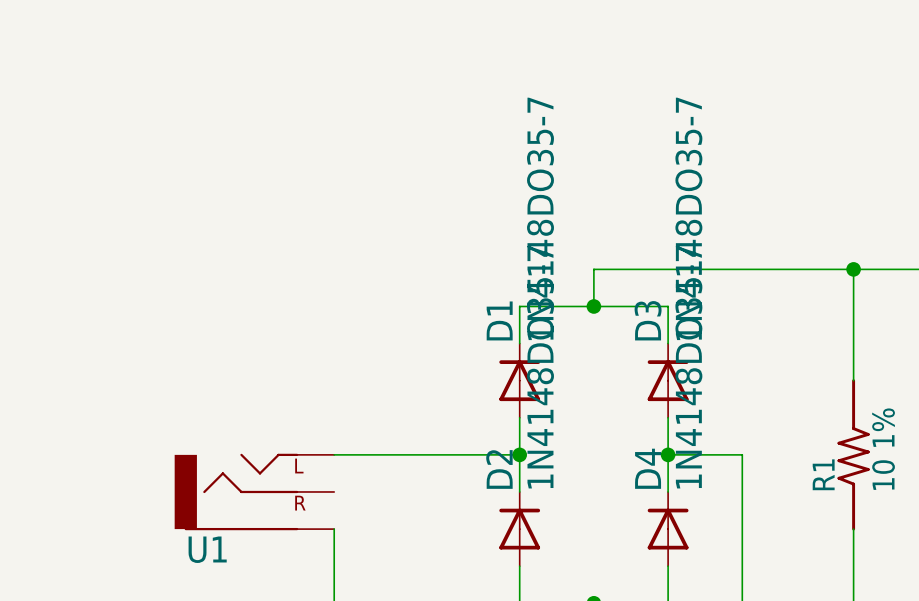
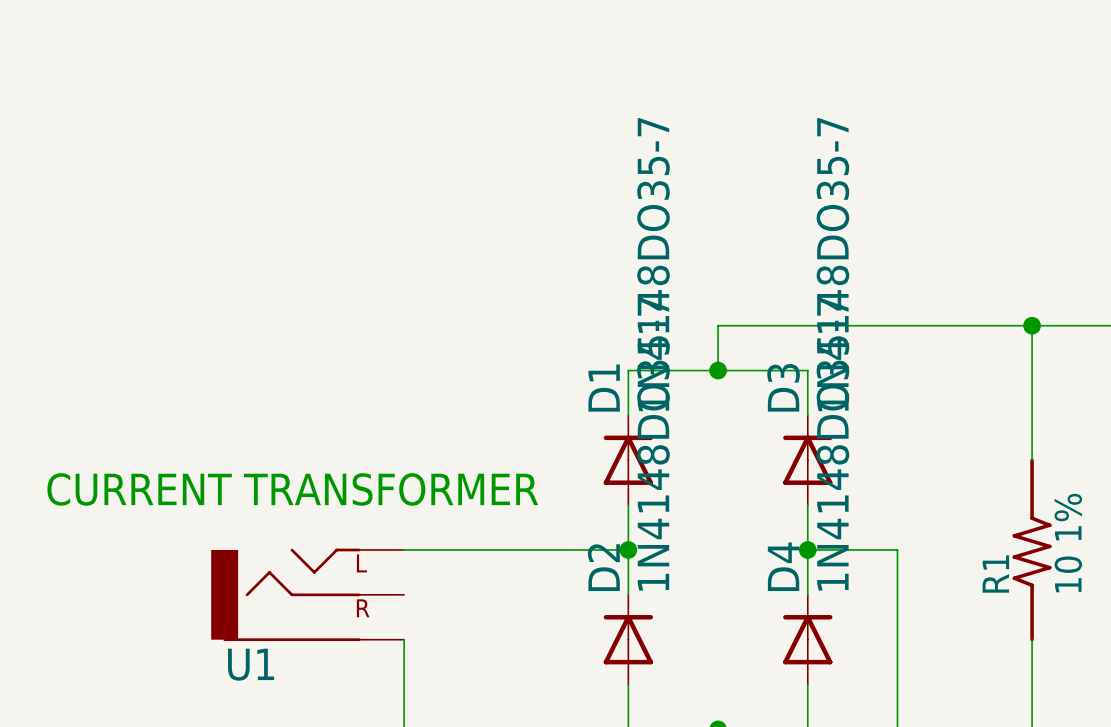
text: none -> CURRENT TRANSFORMER (292, 489)

